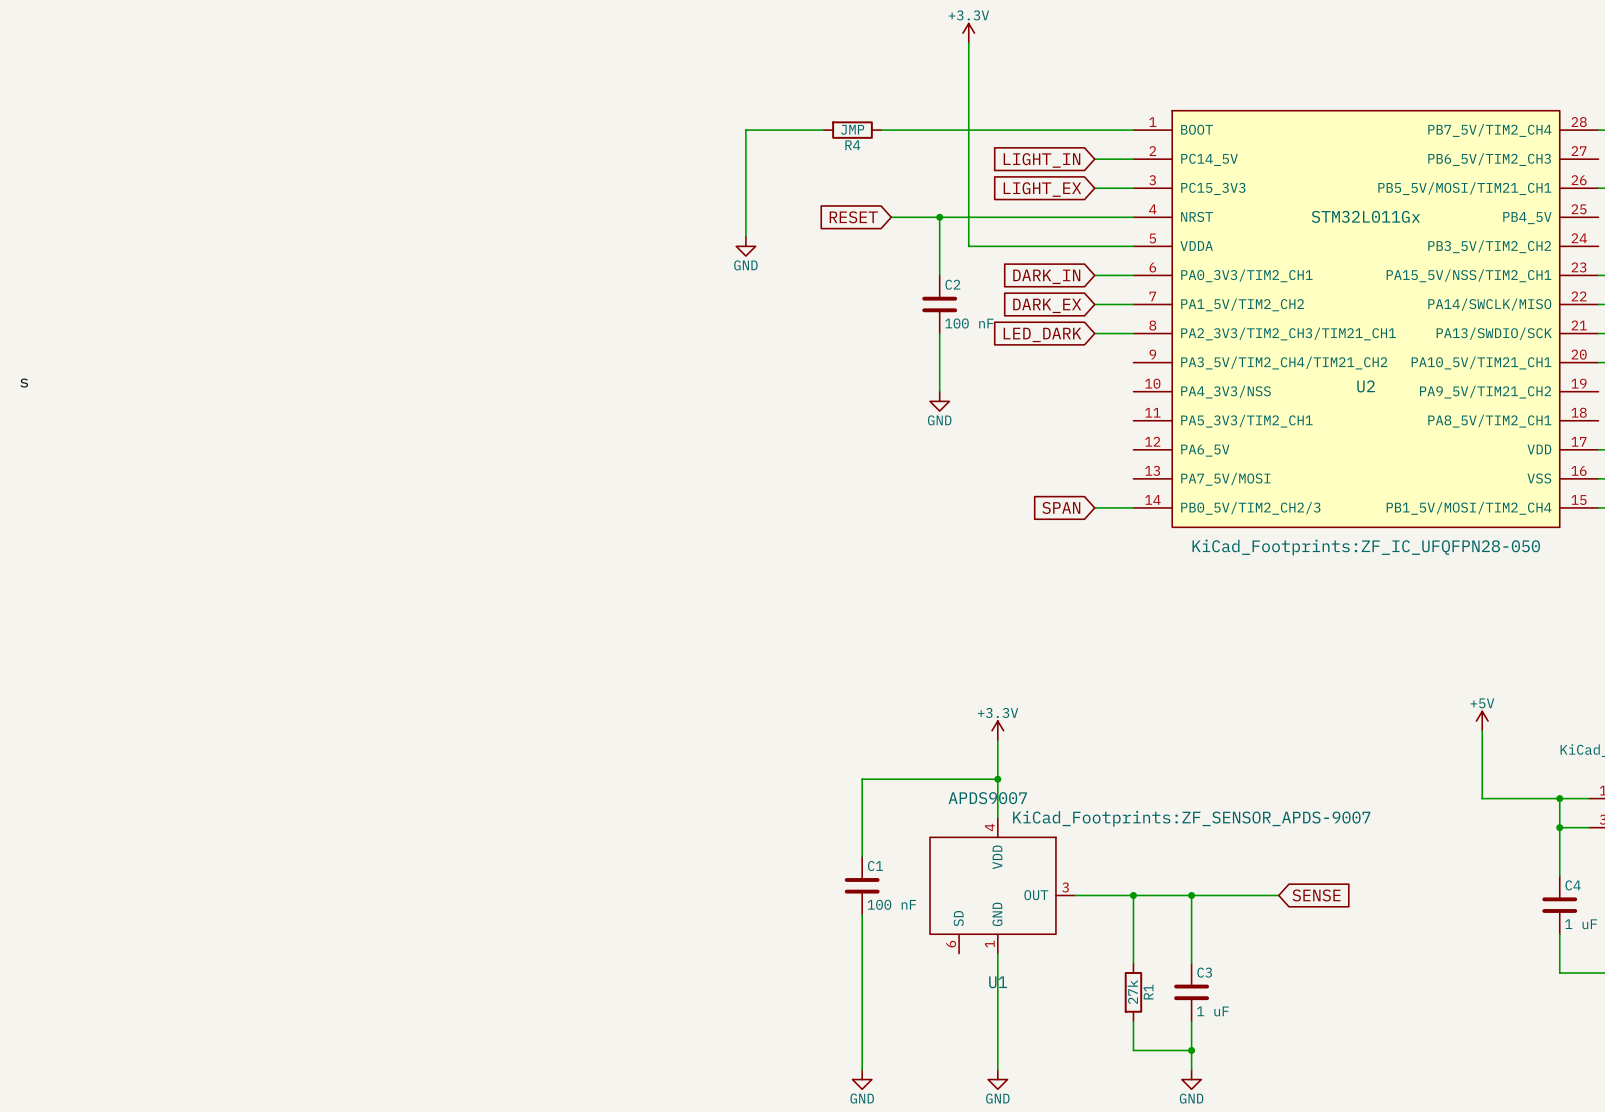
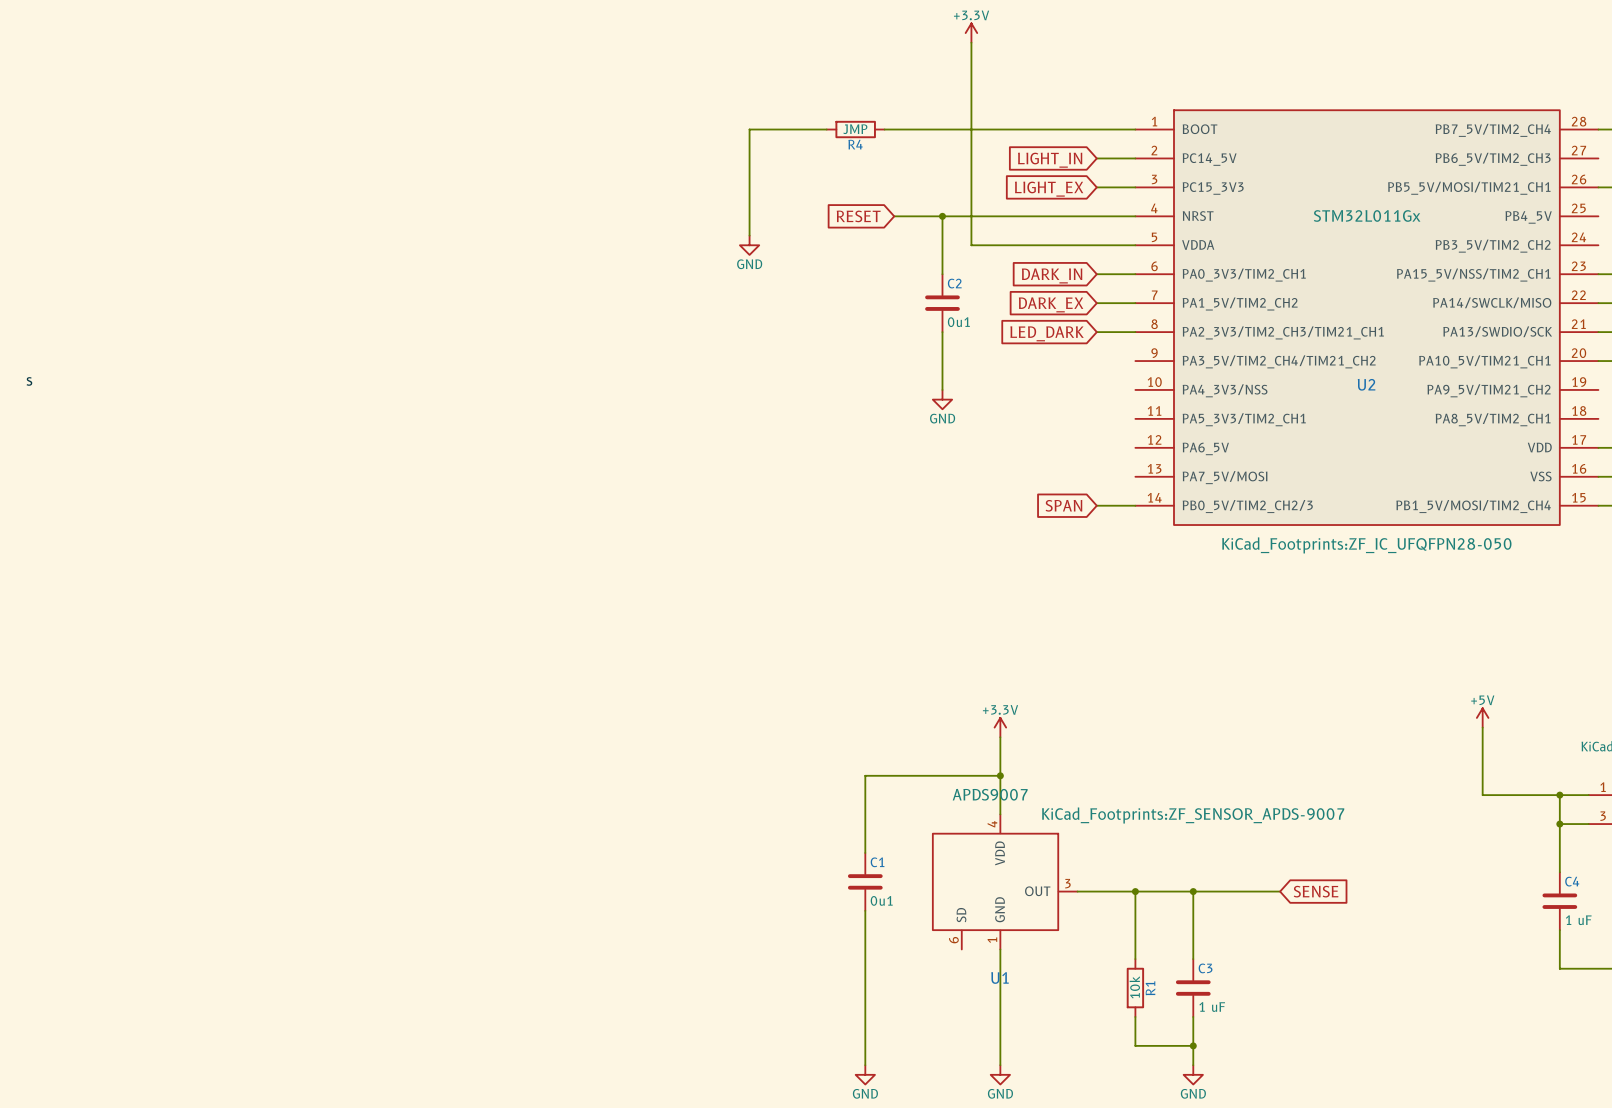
C2 value: 100 nF (969, 323) -> 0u1 (958, 322)
C1 value: 100 nF (891, 904) -> 0u1 (881, 900)
R1 value: 27k (1132, 992) -> 10k (1134, 987)

